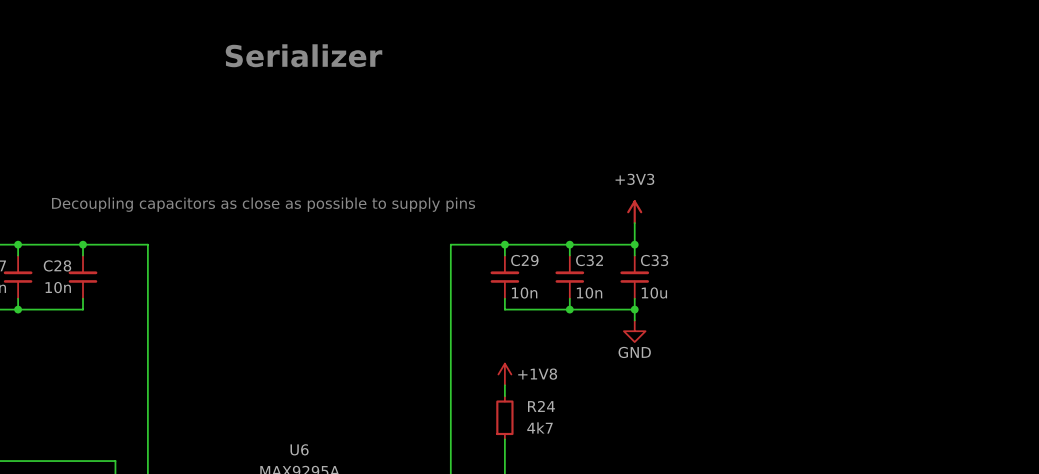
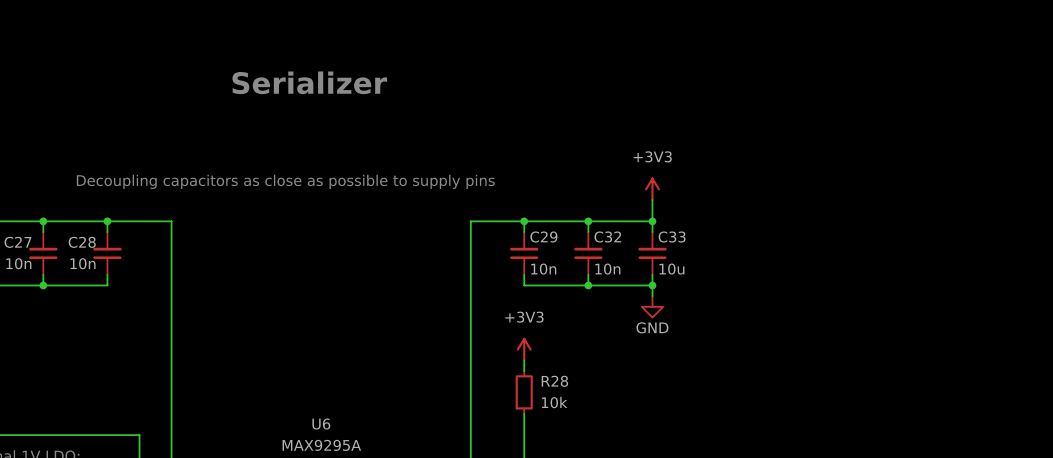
text position: Serializer (304, 55) -> Serializer (309, 82)
power symbol: +1V8 (504, 374) -> +3V3 (524, 349)
R24 name: R24 (541, 406) -> R28 (554, 381)
R24 text: 4k7 (540, 427) -> 10k (554, 402)

